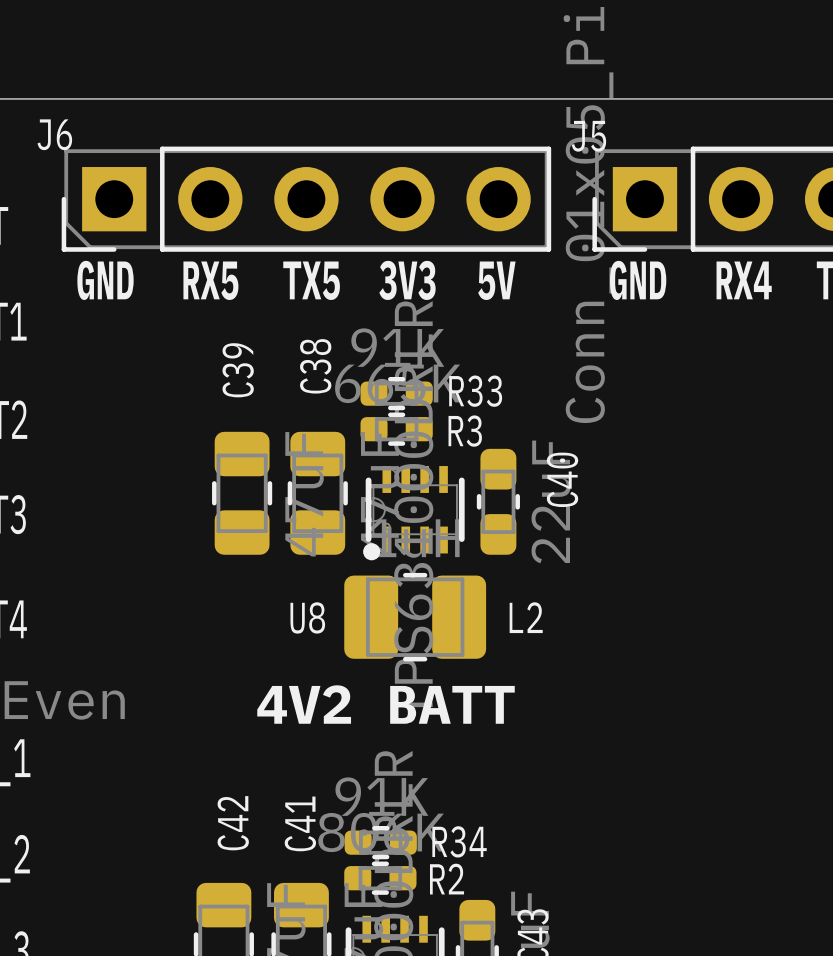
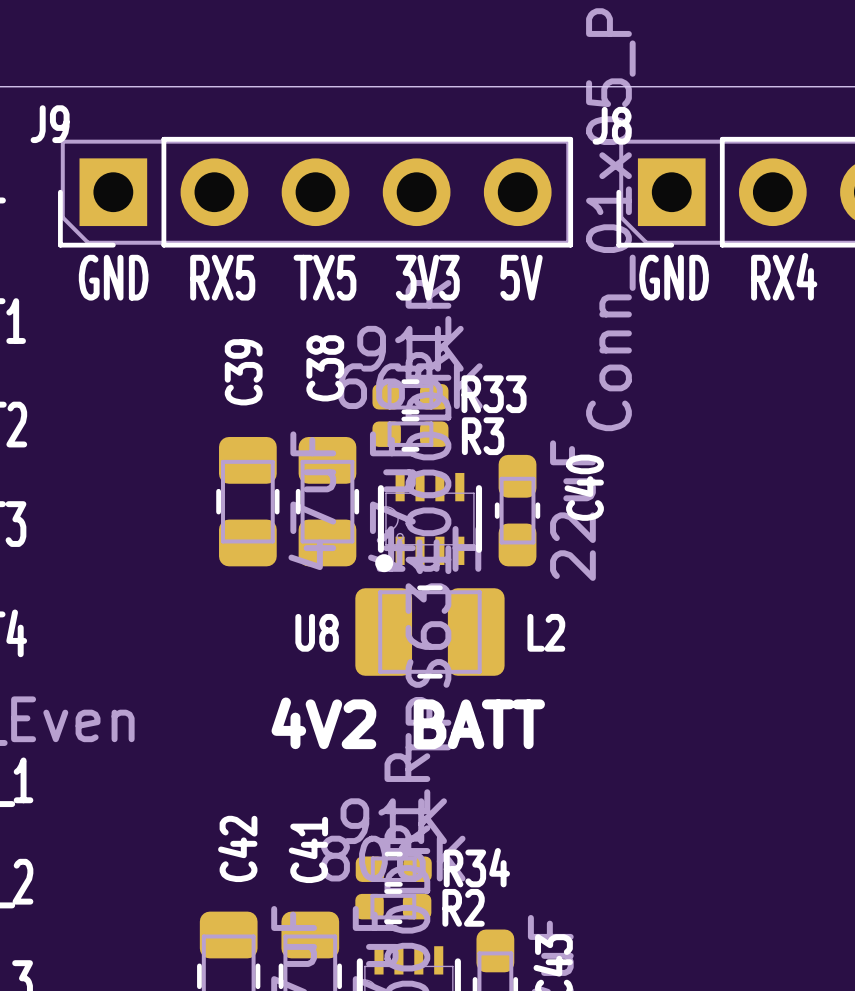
J6 name: J6 (54, 134) -> J9 (50, 124)
J5 name: J5 (588, 136) -> J8 (612, 125)

